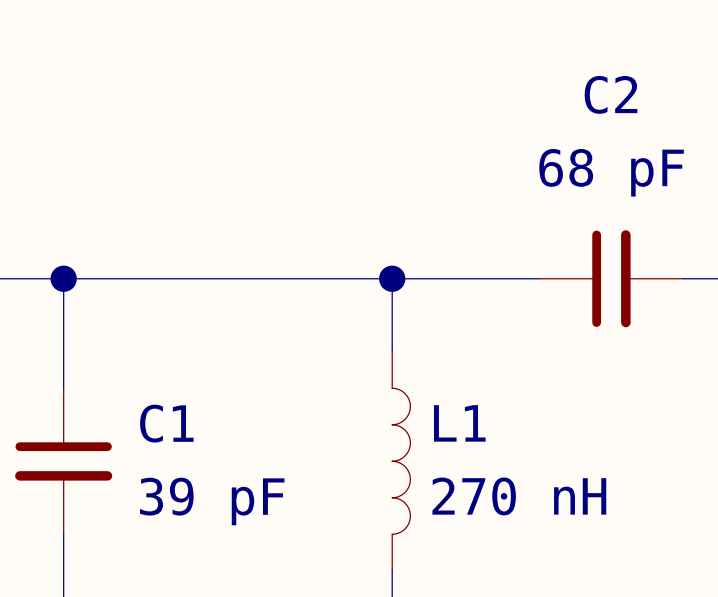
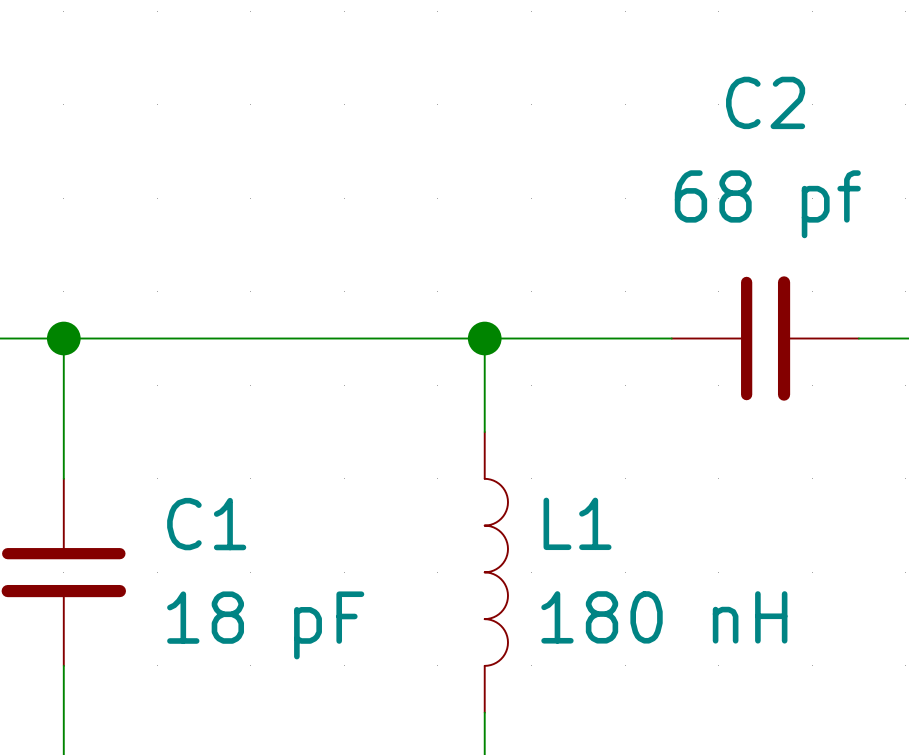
C2 value: 68 pF (611, 172) -> 68 pf (767, 204)
L1 value: 270 nH (519, 496) -> 180 nH (664, 617)
C1 value: 39 pF (212, 501) -> 18 pF (265, 625)

